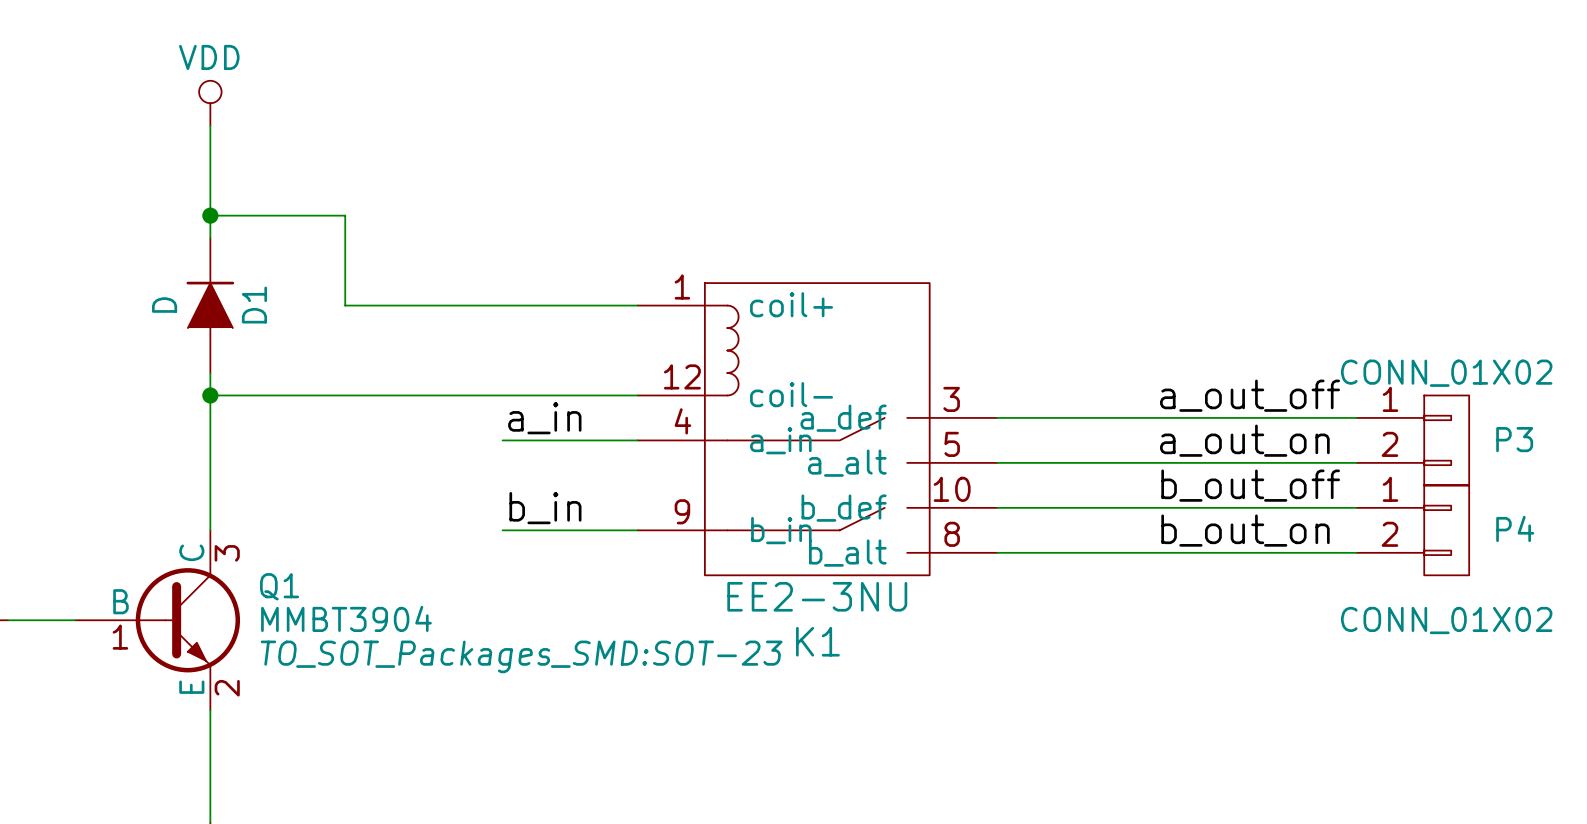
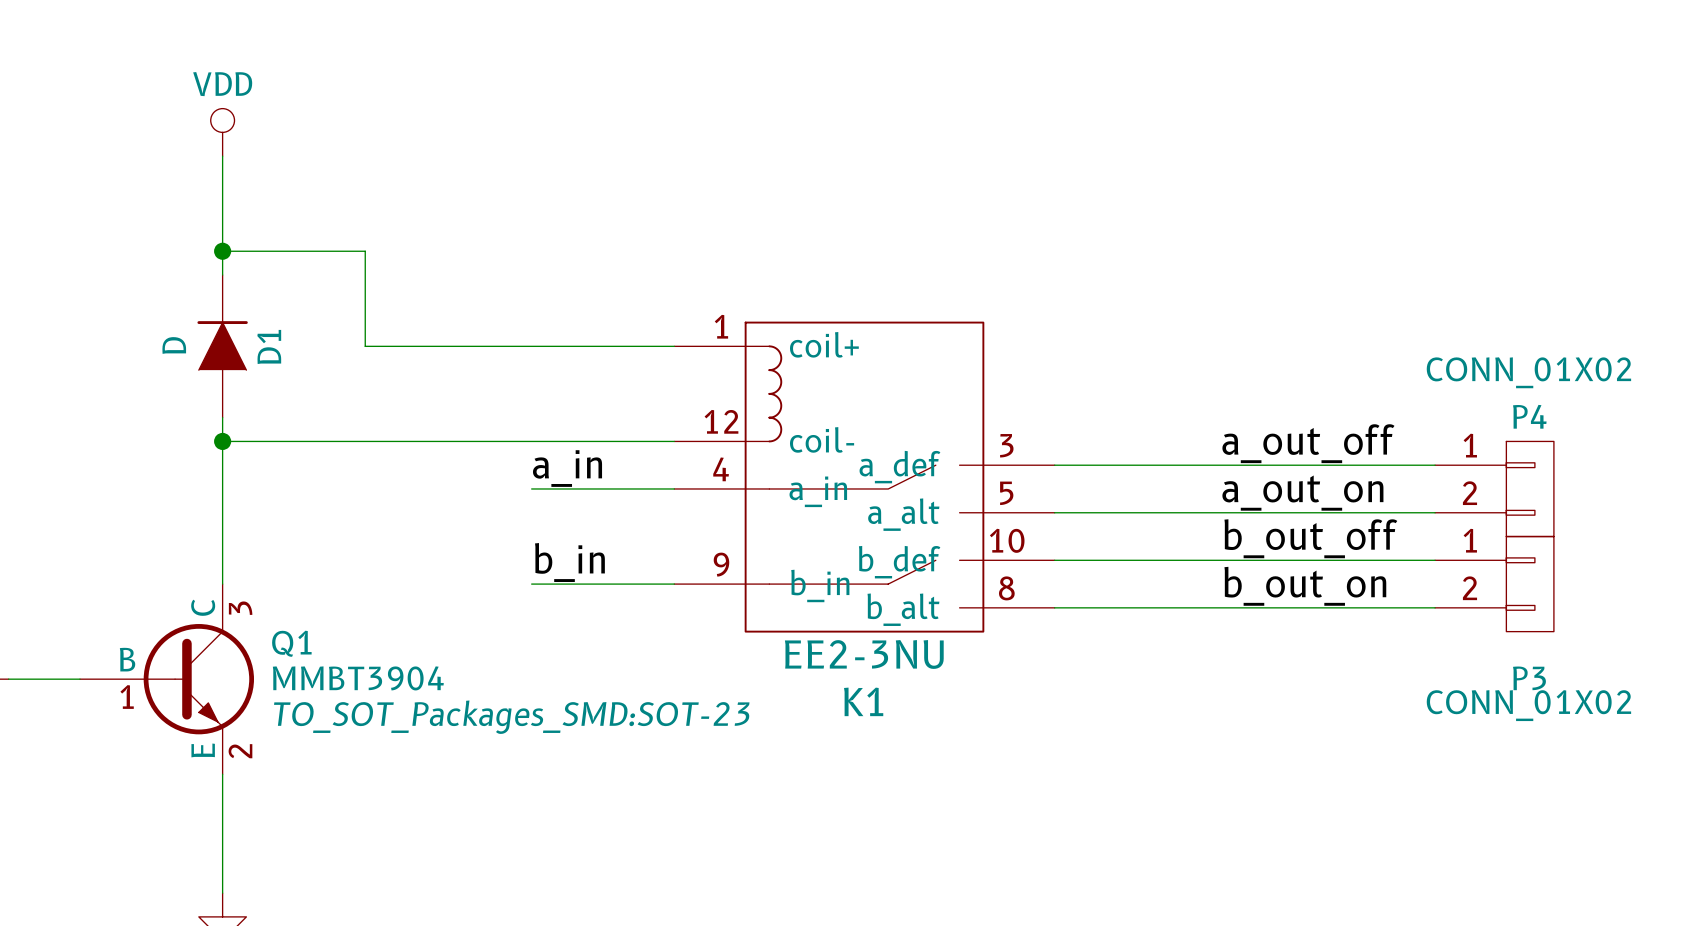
P3 value position: CONN_01X02 (1446, 373) -> CONN_01X02 (1528, 705)
P3 name: P3 (1514, 439) -> P4 (1529, 416)
P4 name: P4 (1515, 528) -> P3 (1529, 678)
P4 value position: CONN_01X02 (1446, 620) -> CONN_01X02 (1528, 372)

